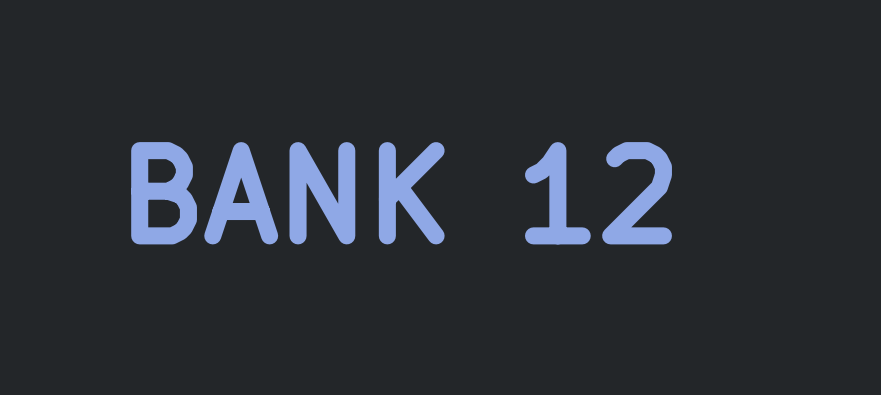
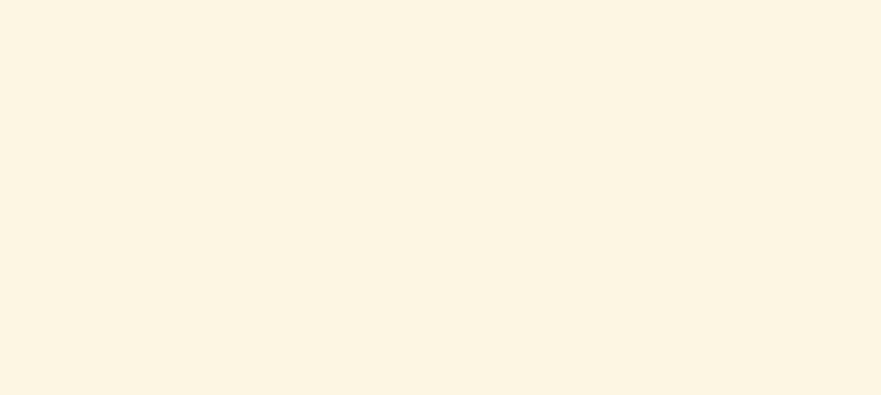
text: BANK 12 (401, 193) -> none

